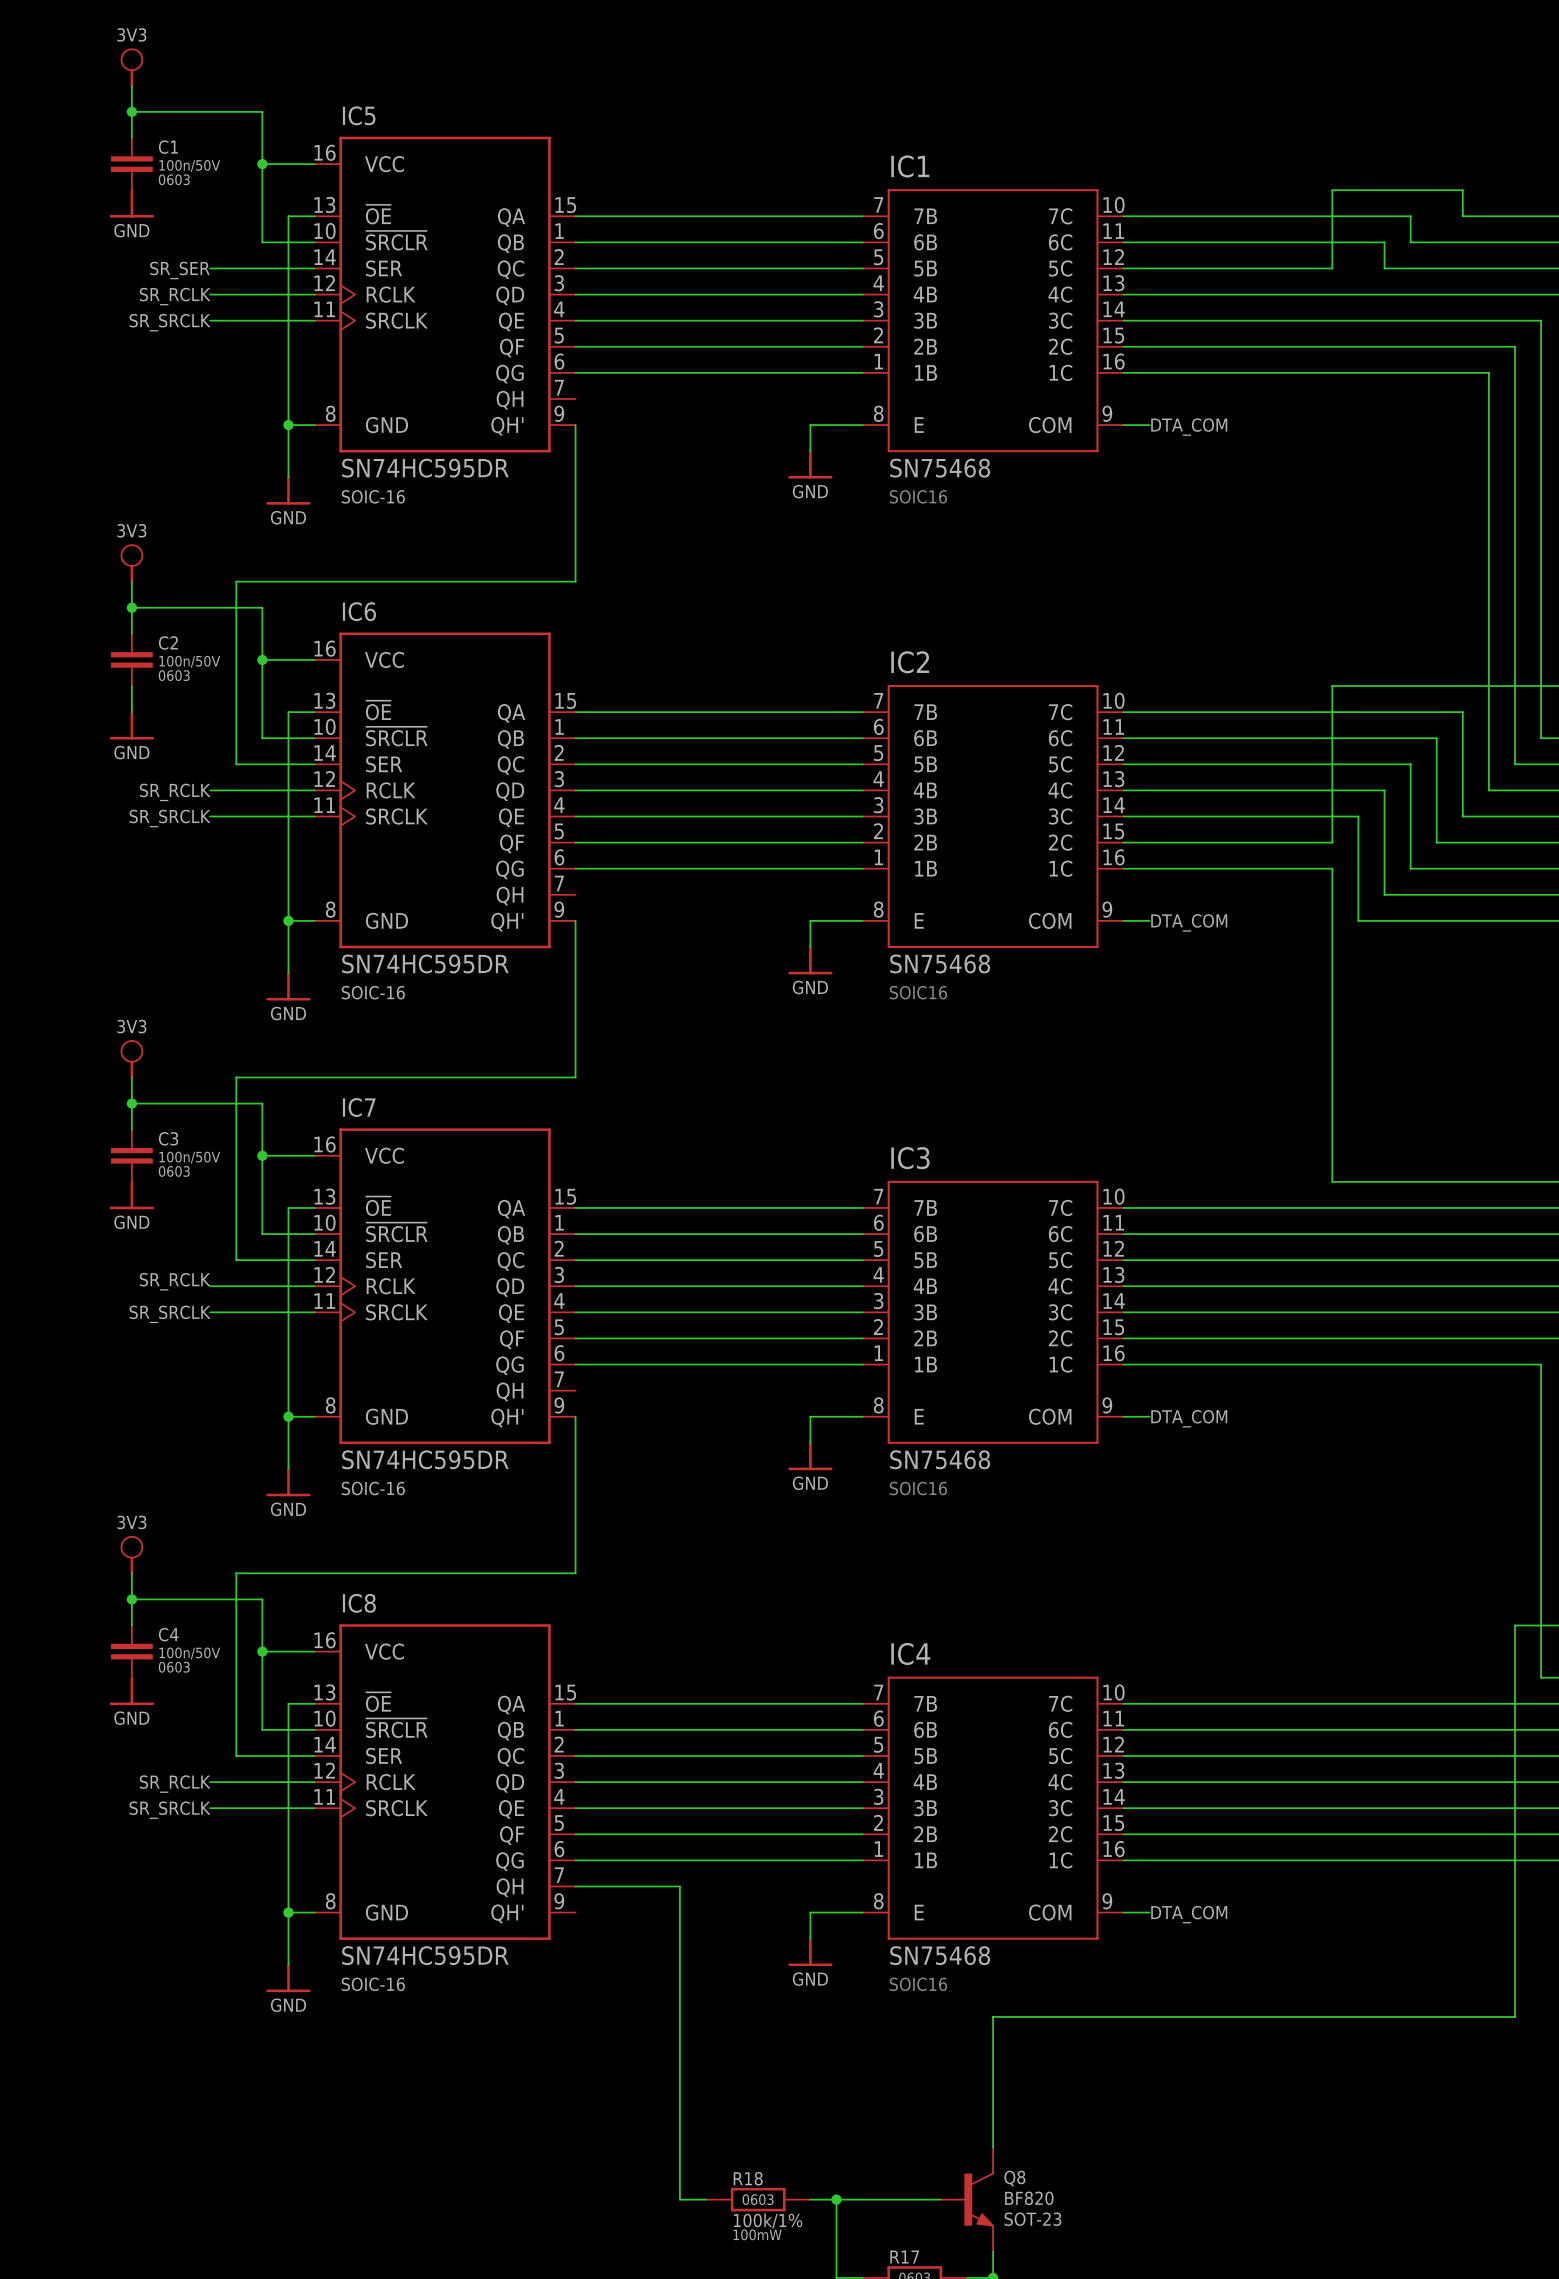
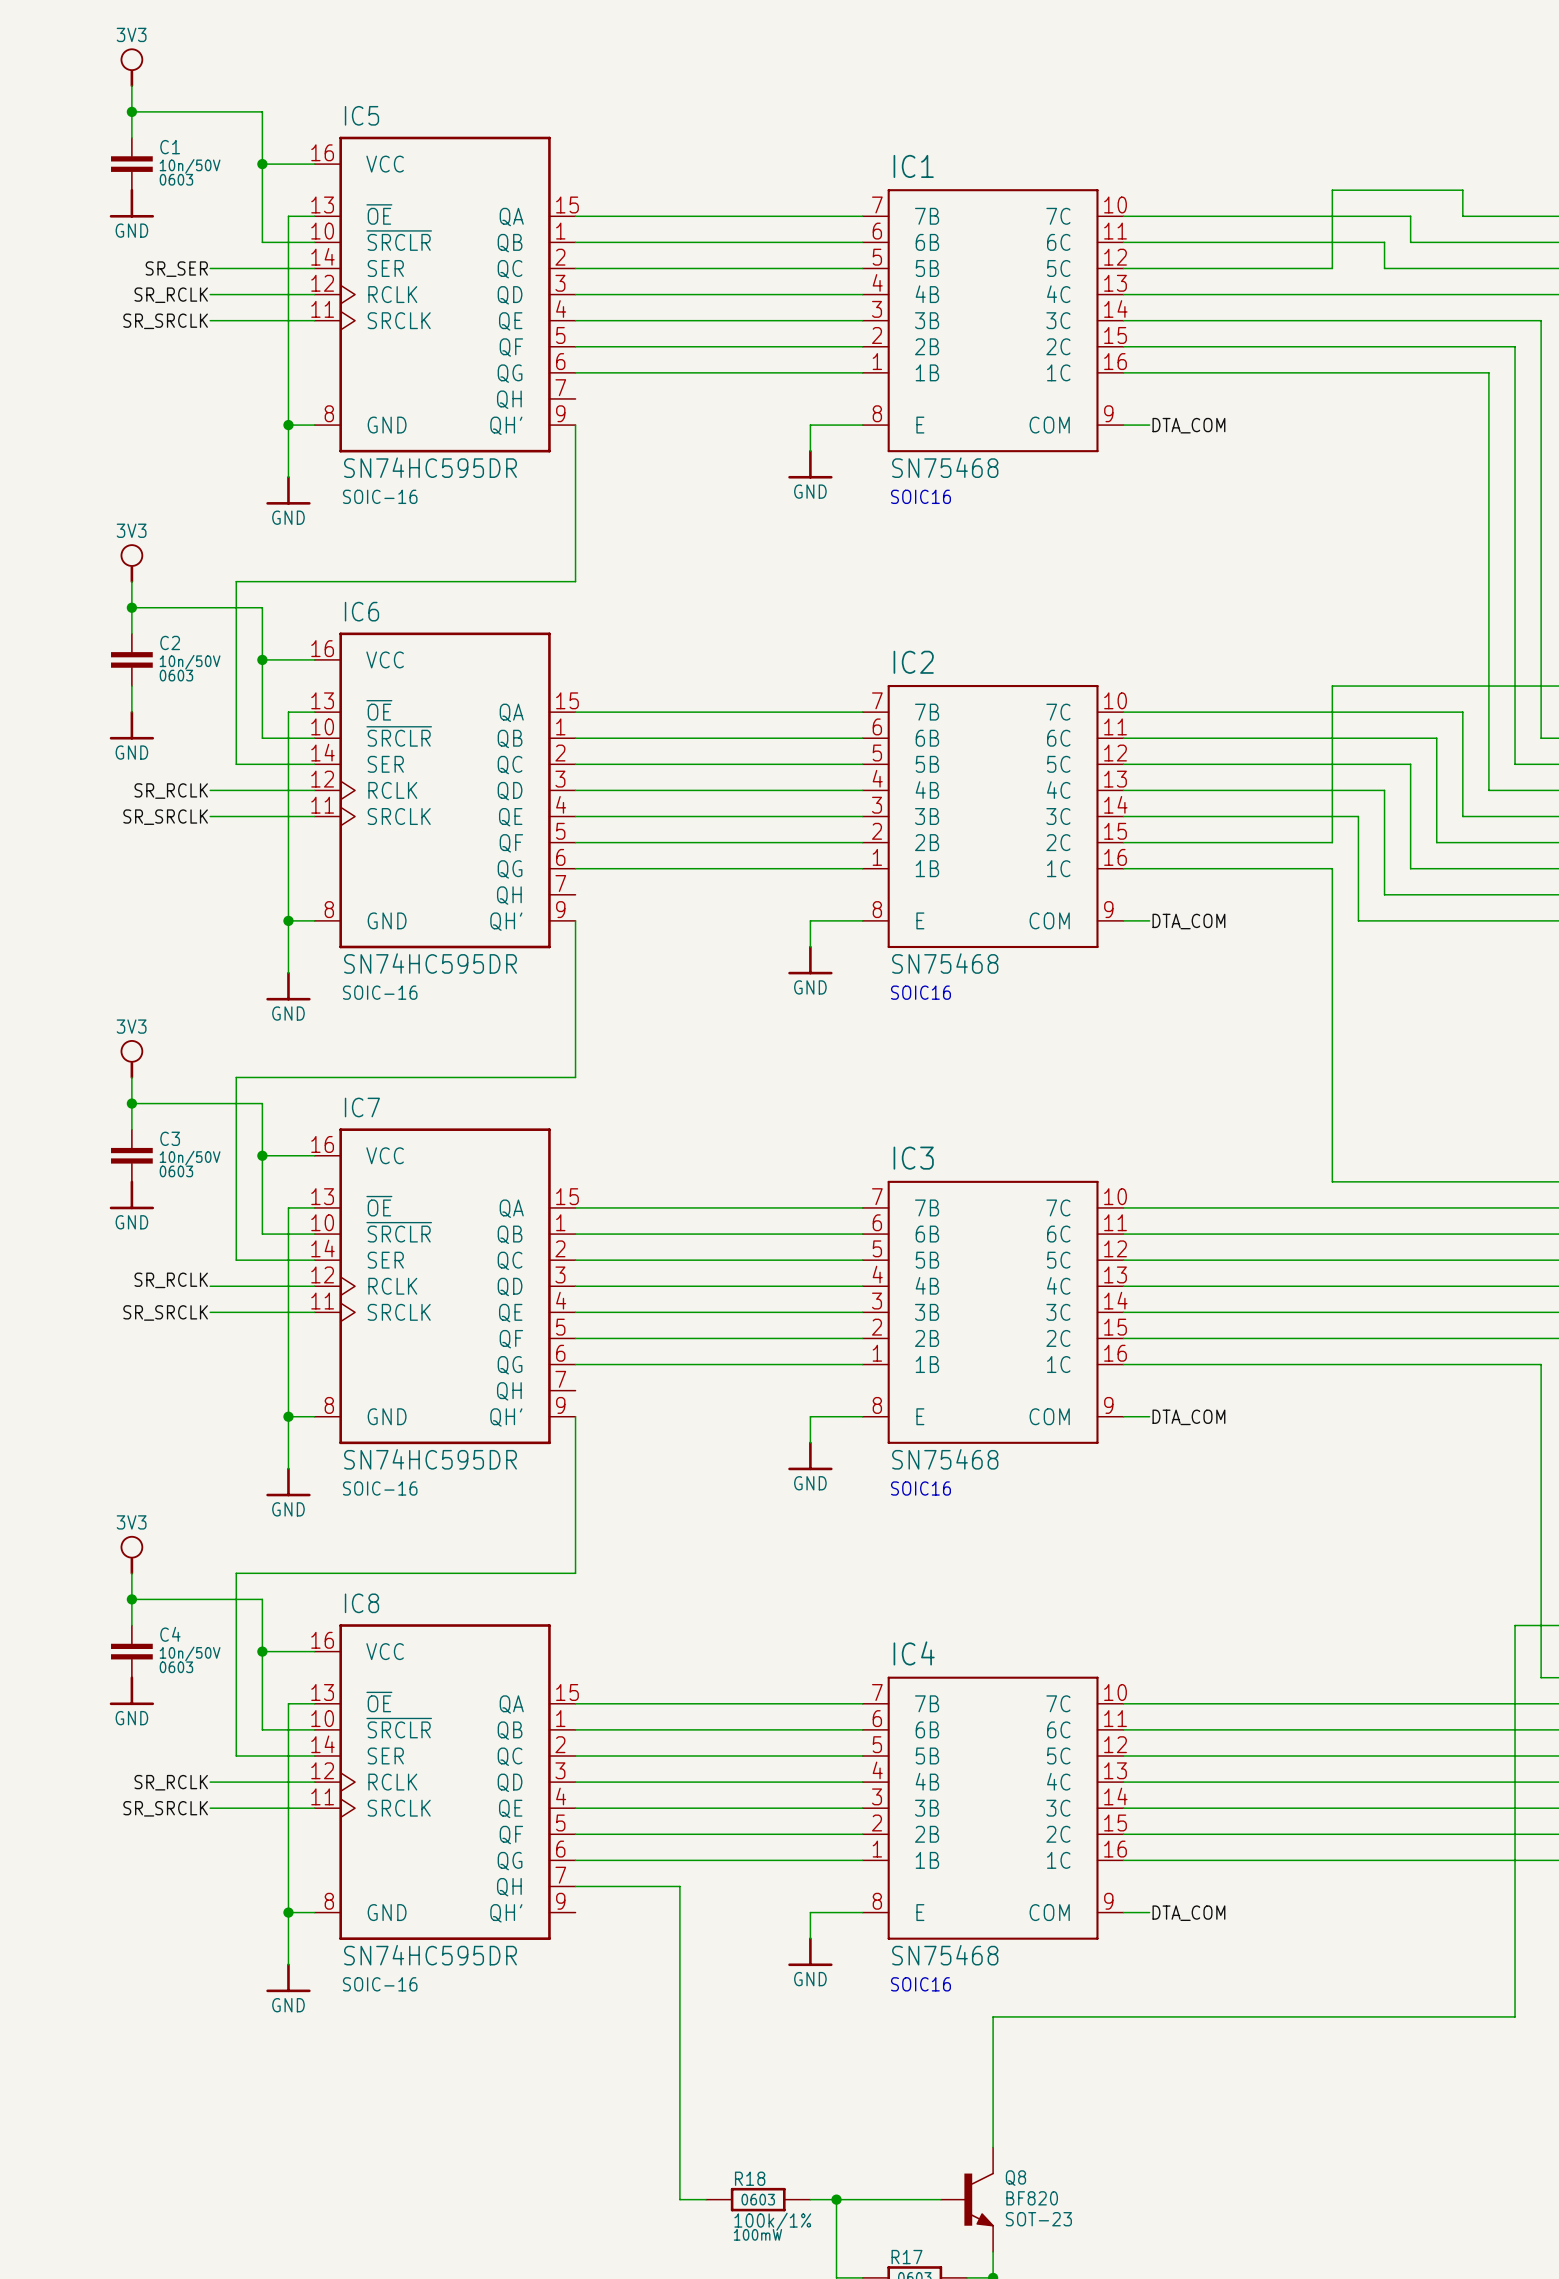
C1 value: 100n/50V (189, 165) -> 10n/50V (190, 166)
C2 value: 100n/50V (189, 661) -> 10n/50V (190, 662)
C3 value: 100n/50V (189, 1157) -> 10n/50V (190, 1158)
C4 value: 100n/50V (189, 1653) -> 10n/50V (190, 1653)

